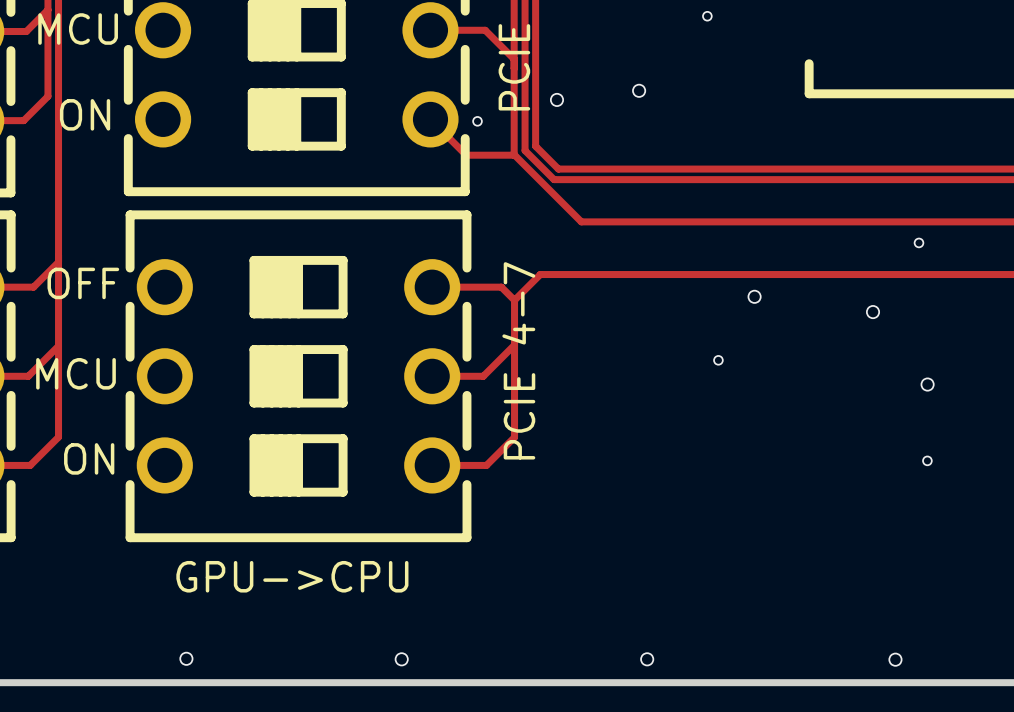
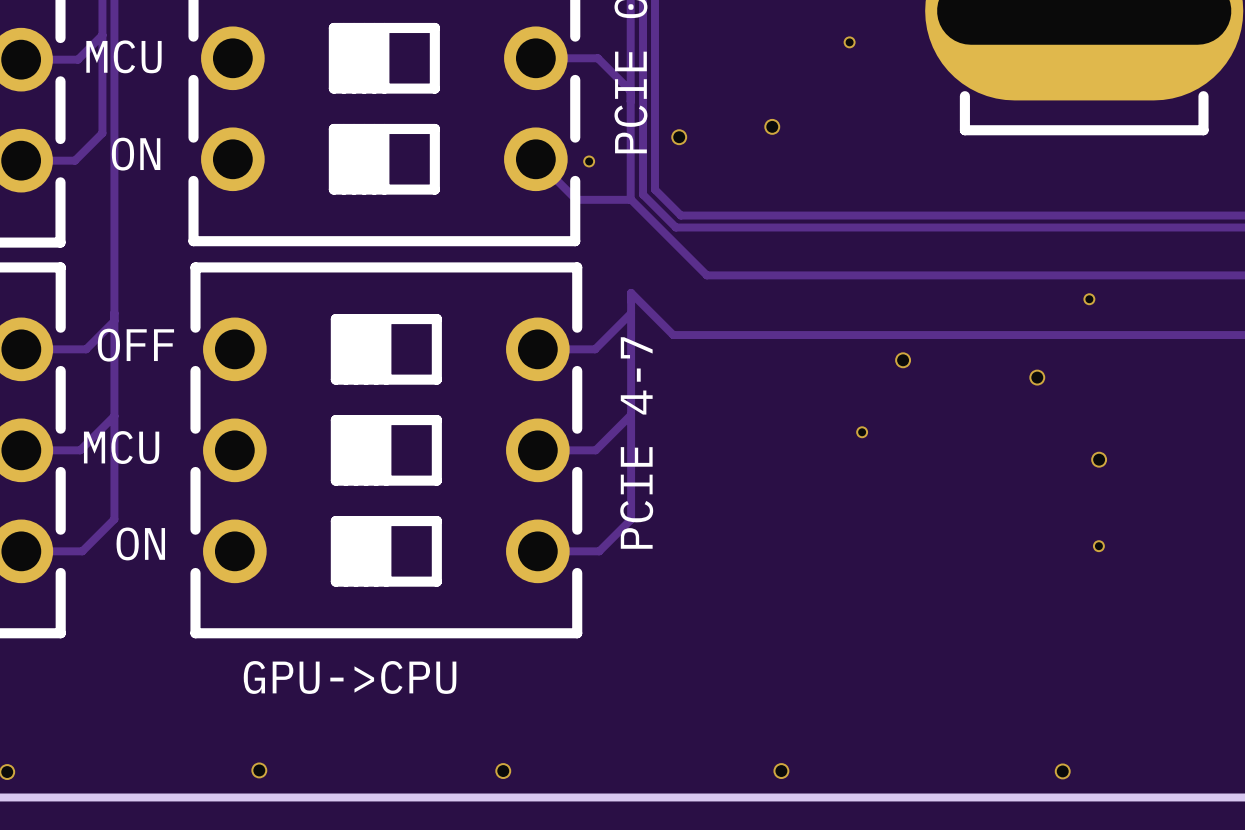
track: none -> (631, 313) (595, 349)
track: (551, 274) (540, 274) (514, 300) (501, 287) (482, 287) -> (673, 335) (631, 292) (631, 364)

